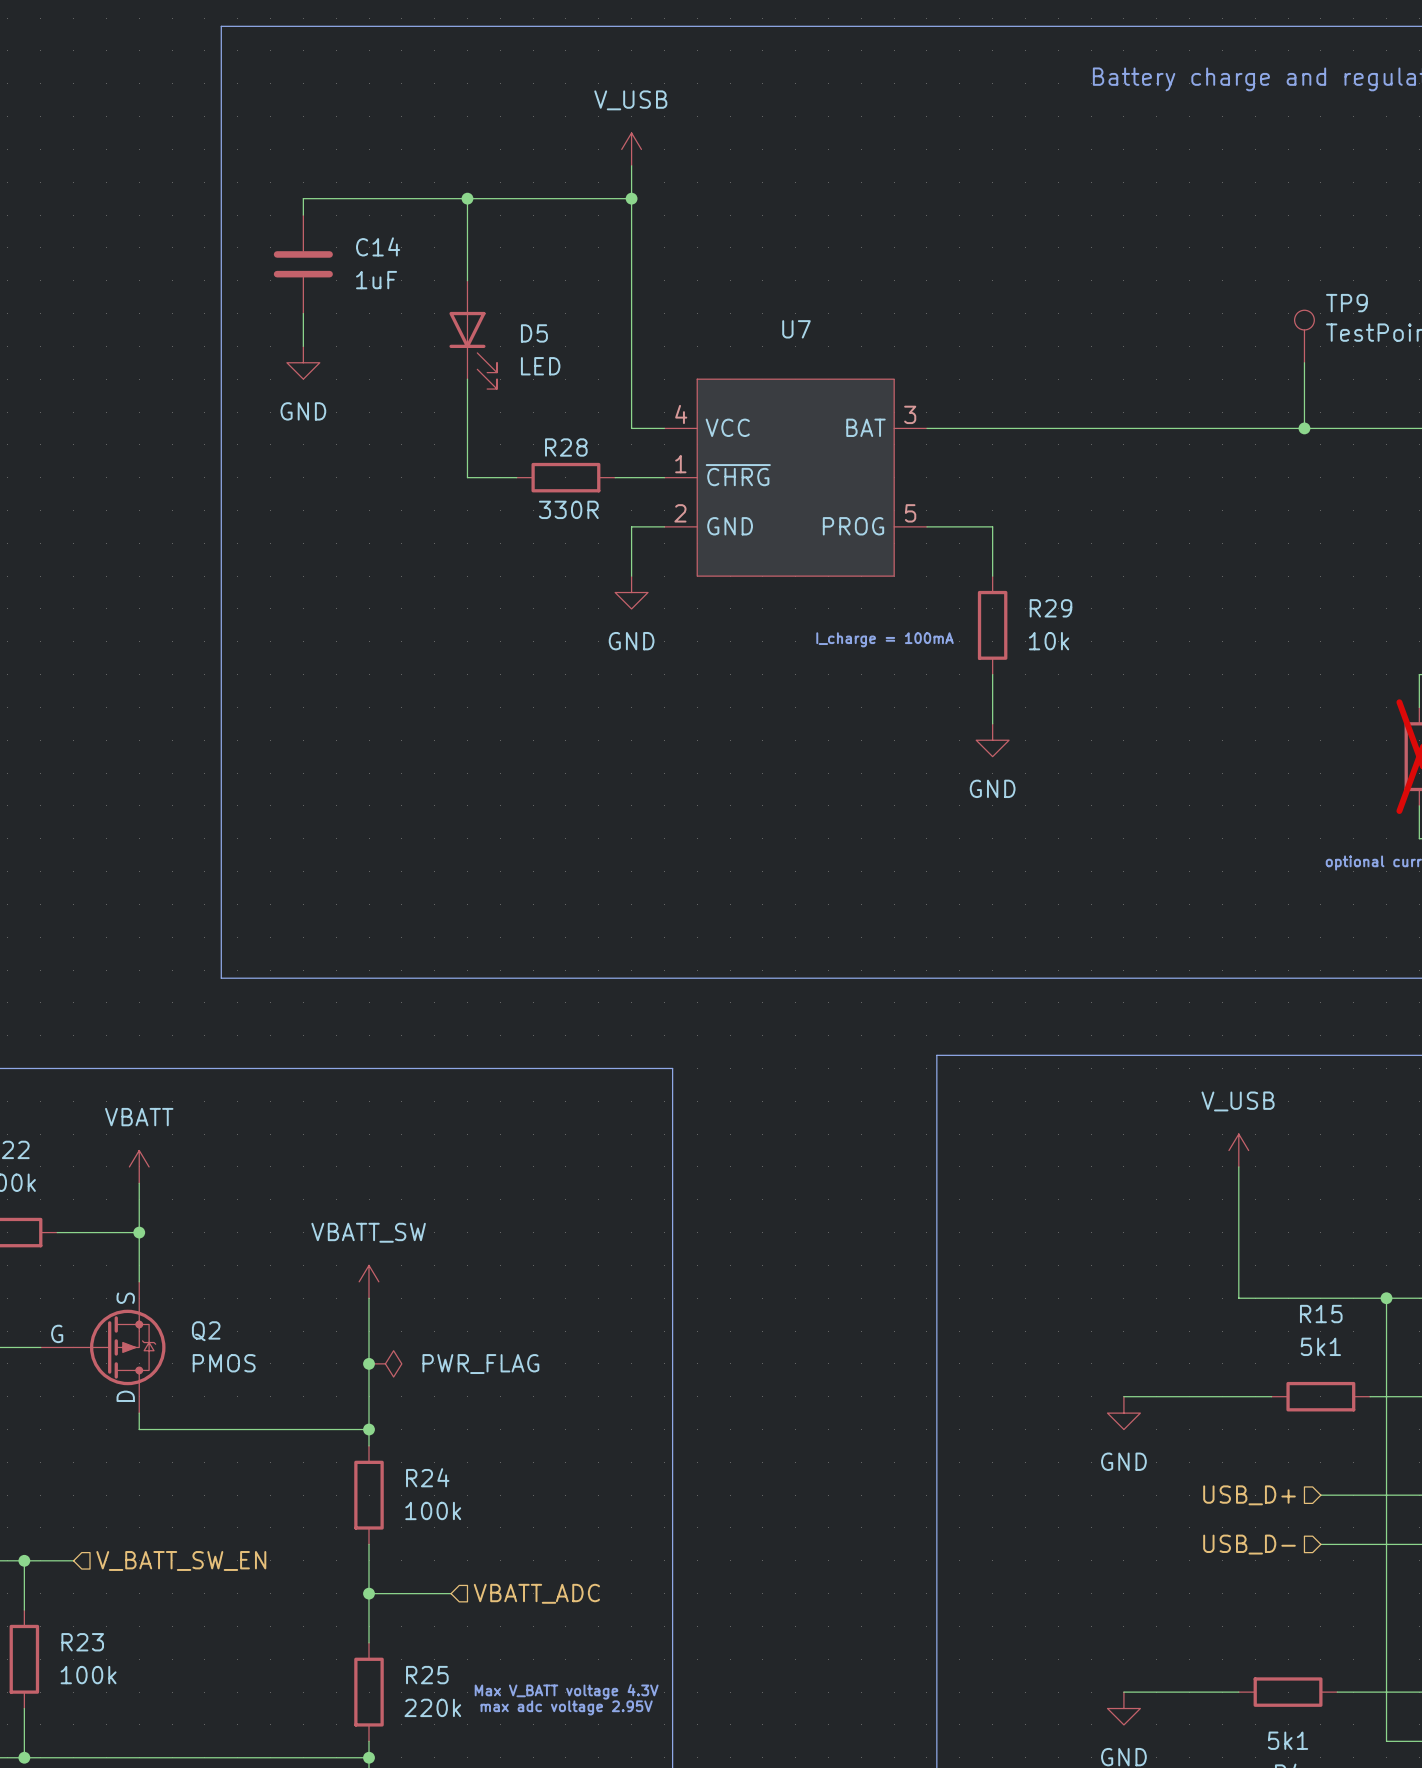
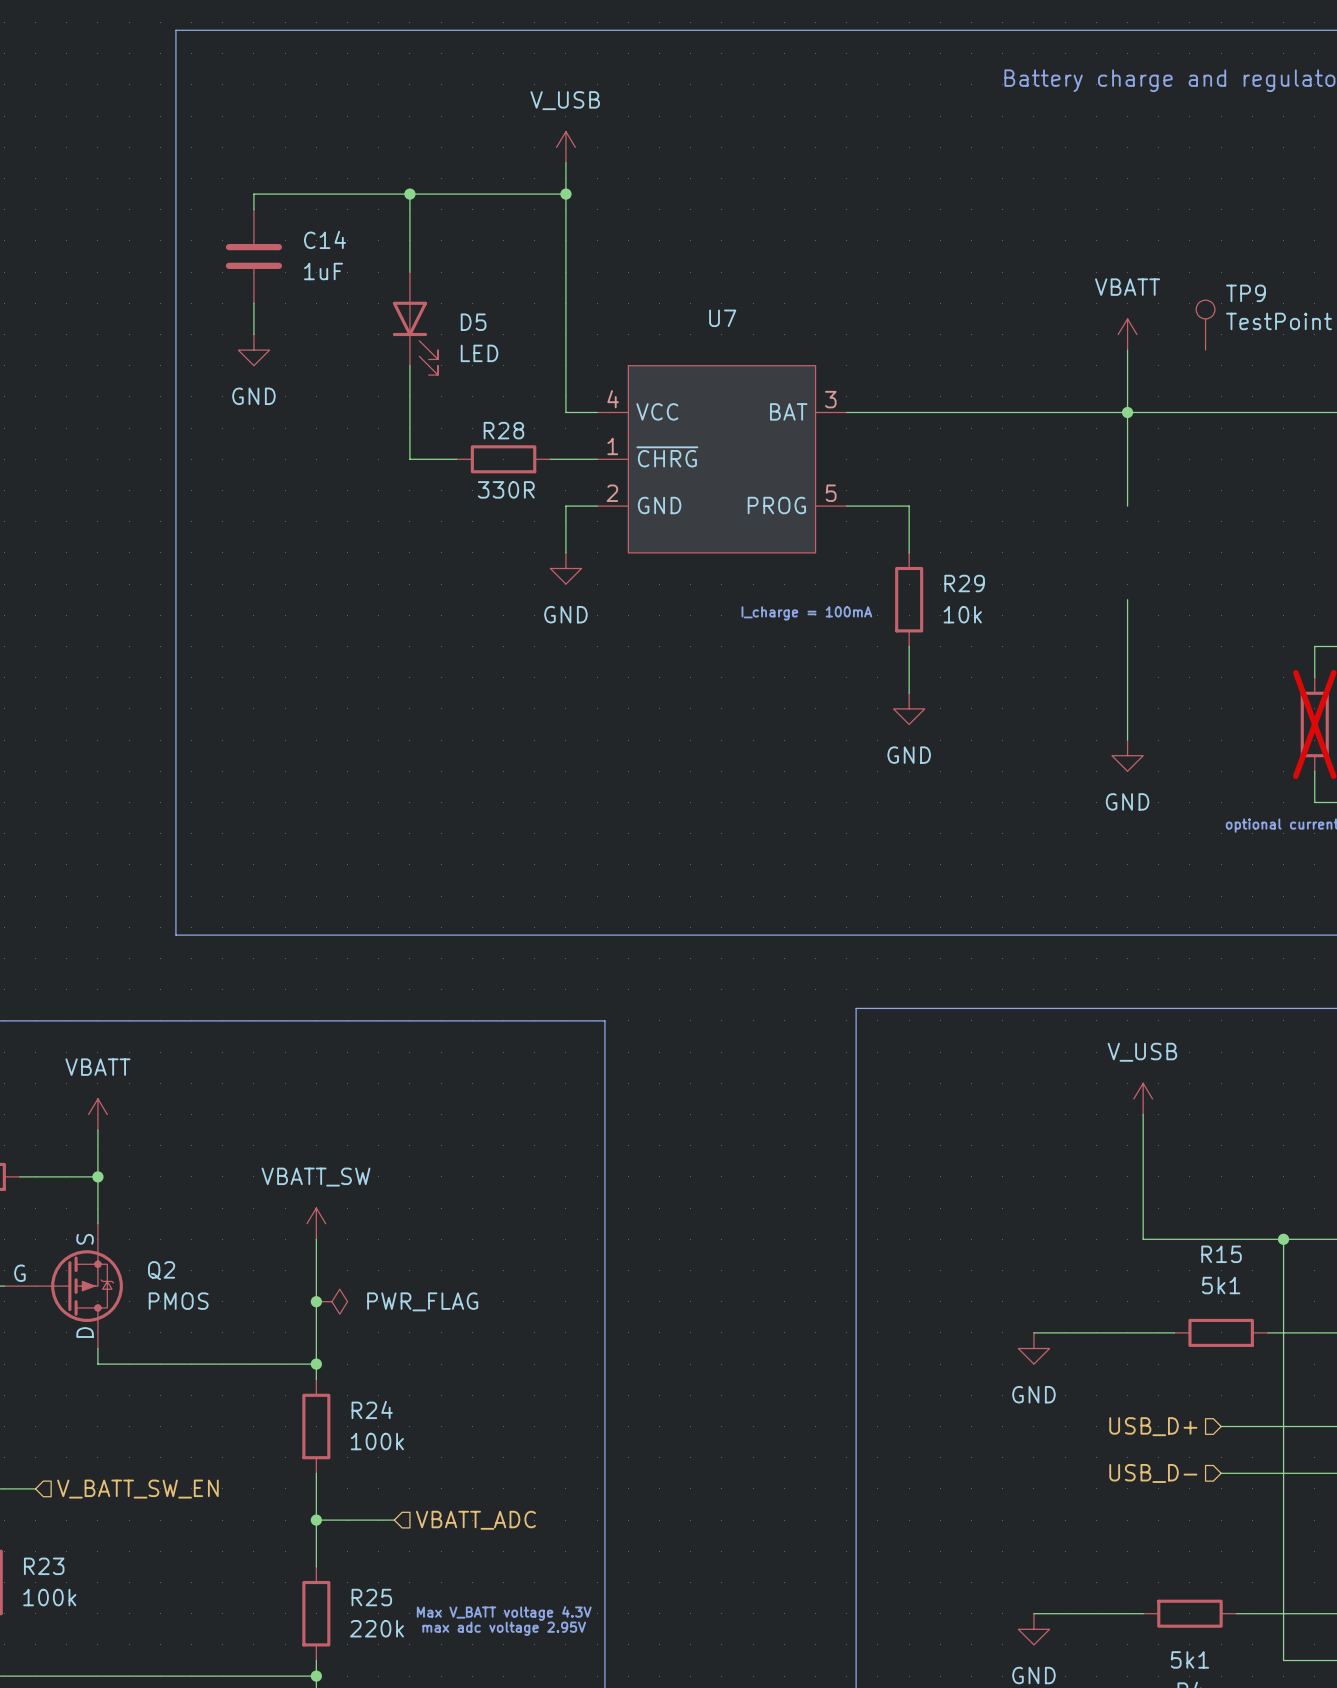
power symbol: none -> VBATT (1127, 334)
wire: none -> (1127, 350) (1127, 506)
wire: (1304, 362) (1304, 428) -> none
junction: none -> (1127, 412)
junction: (1304, 428) -> none
wire: none -> (1127, 599) (1127, 740)
power symbol: none -> GND (1127, 755)

